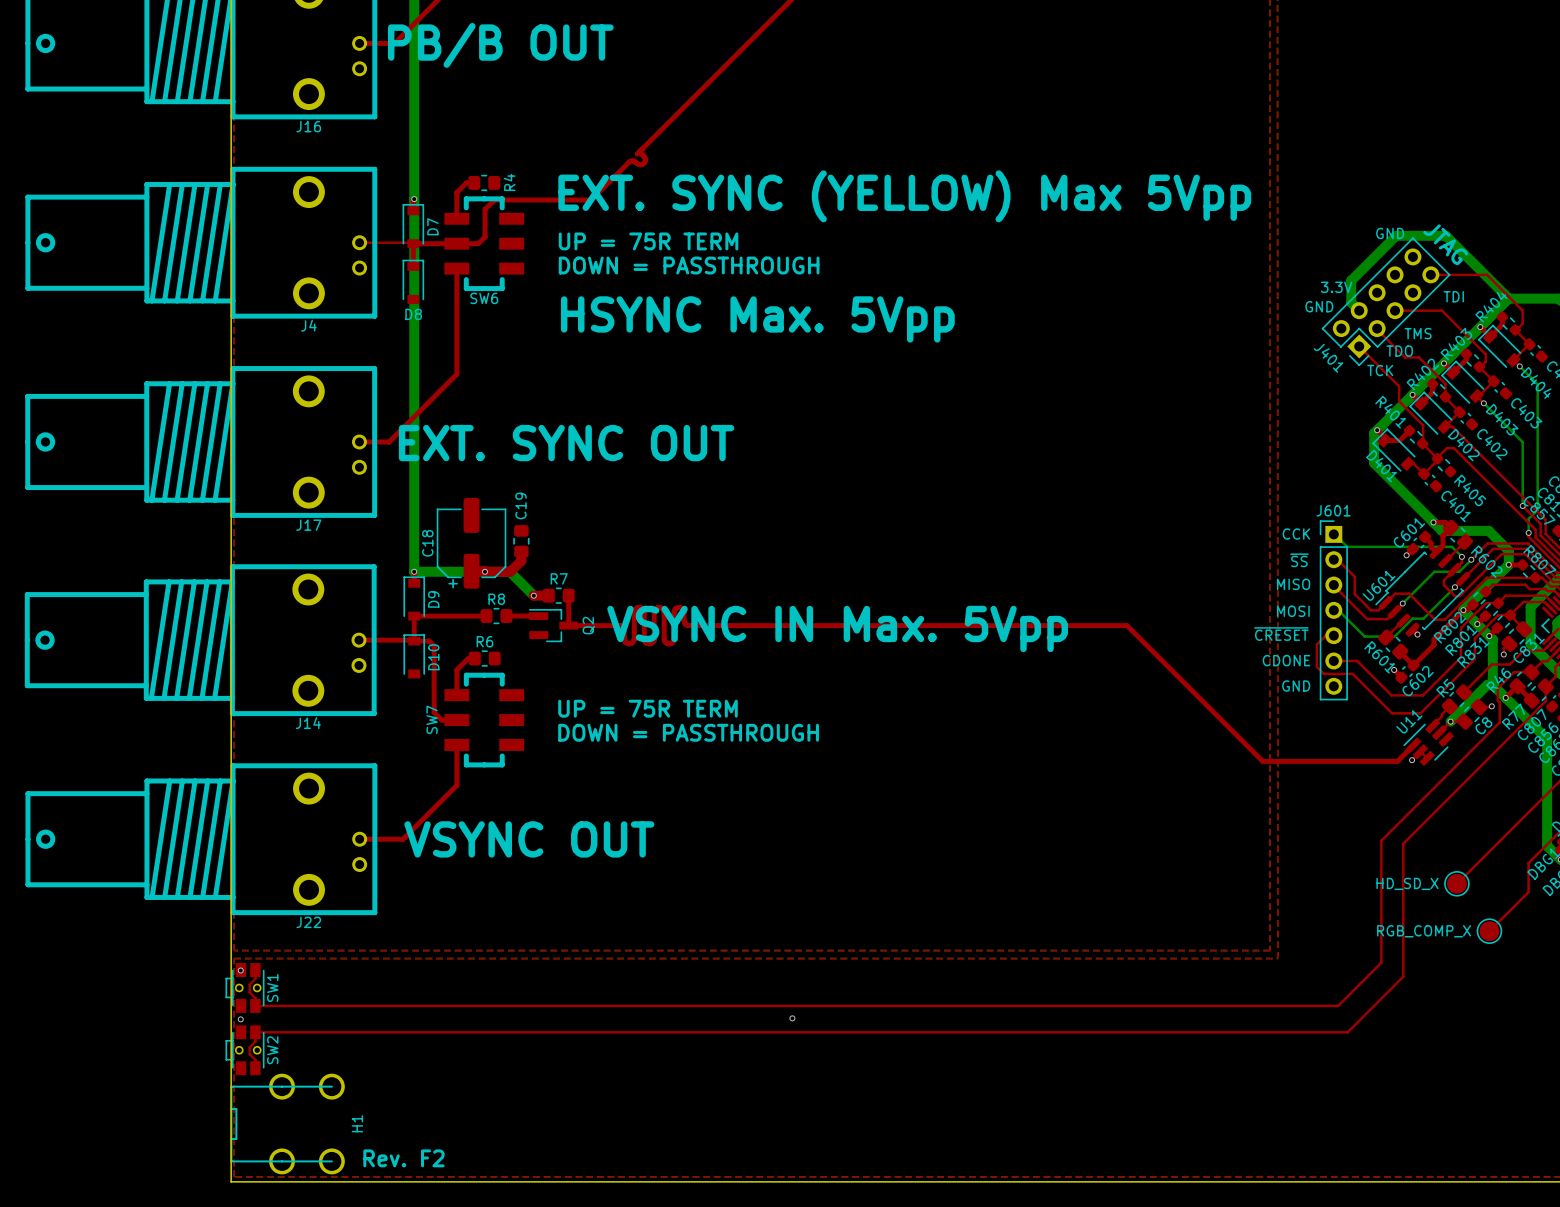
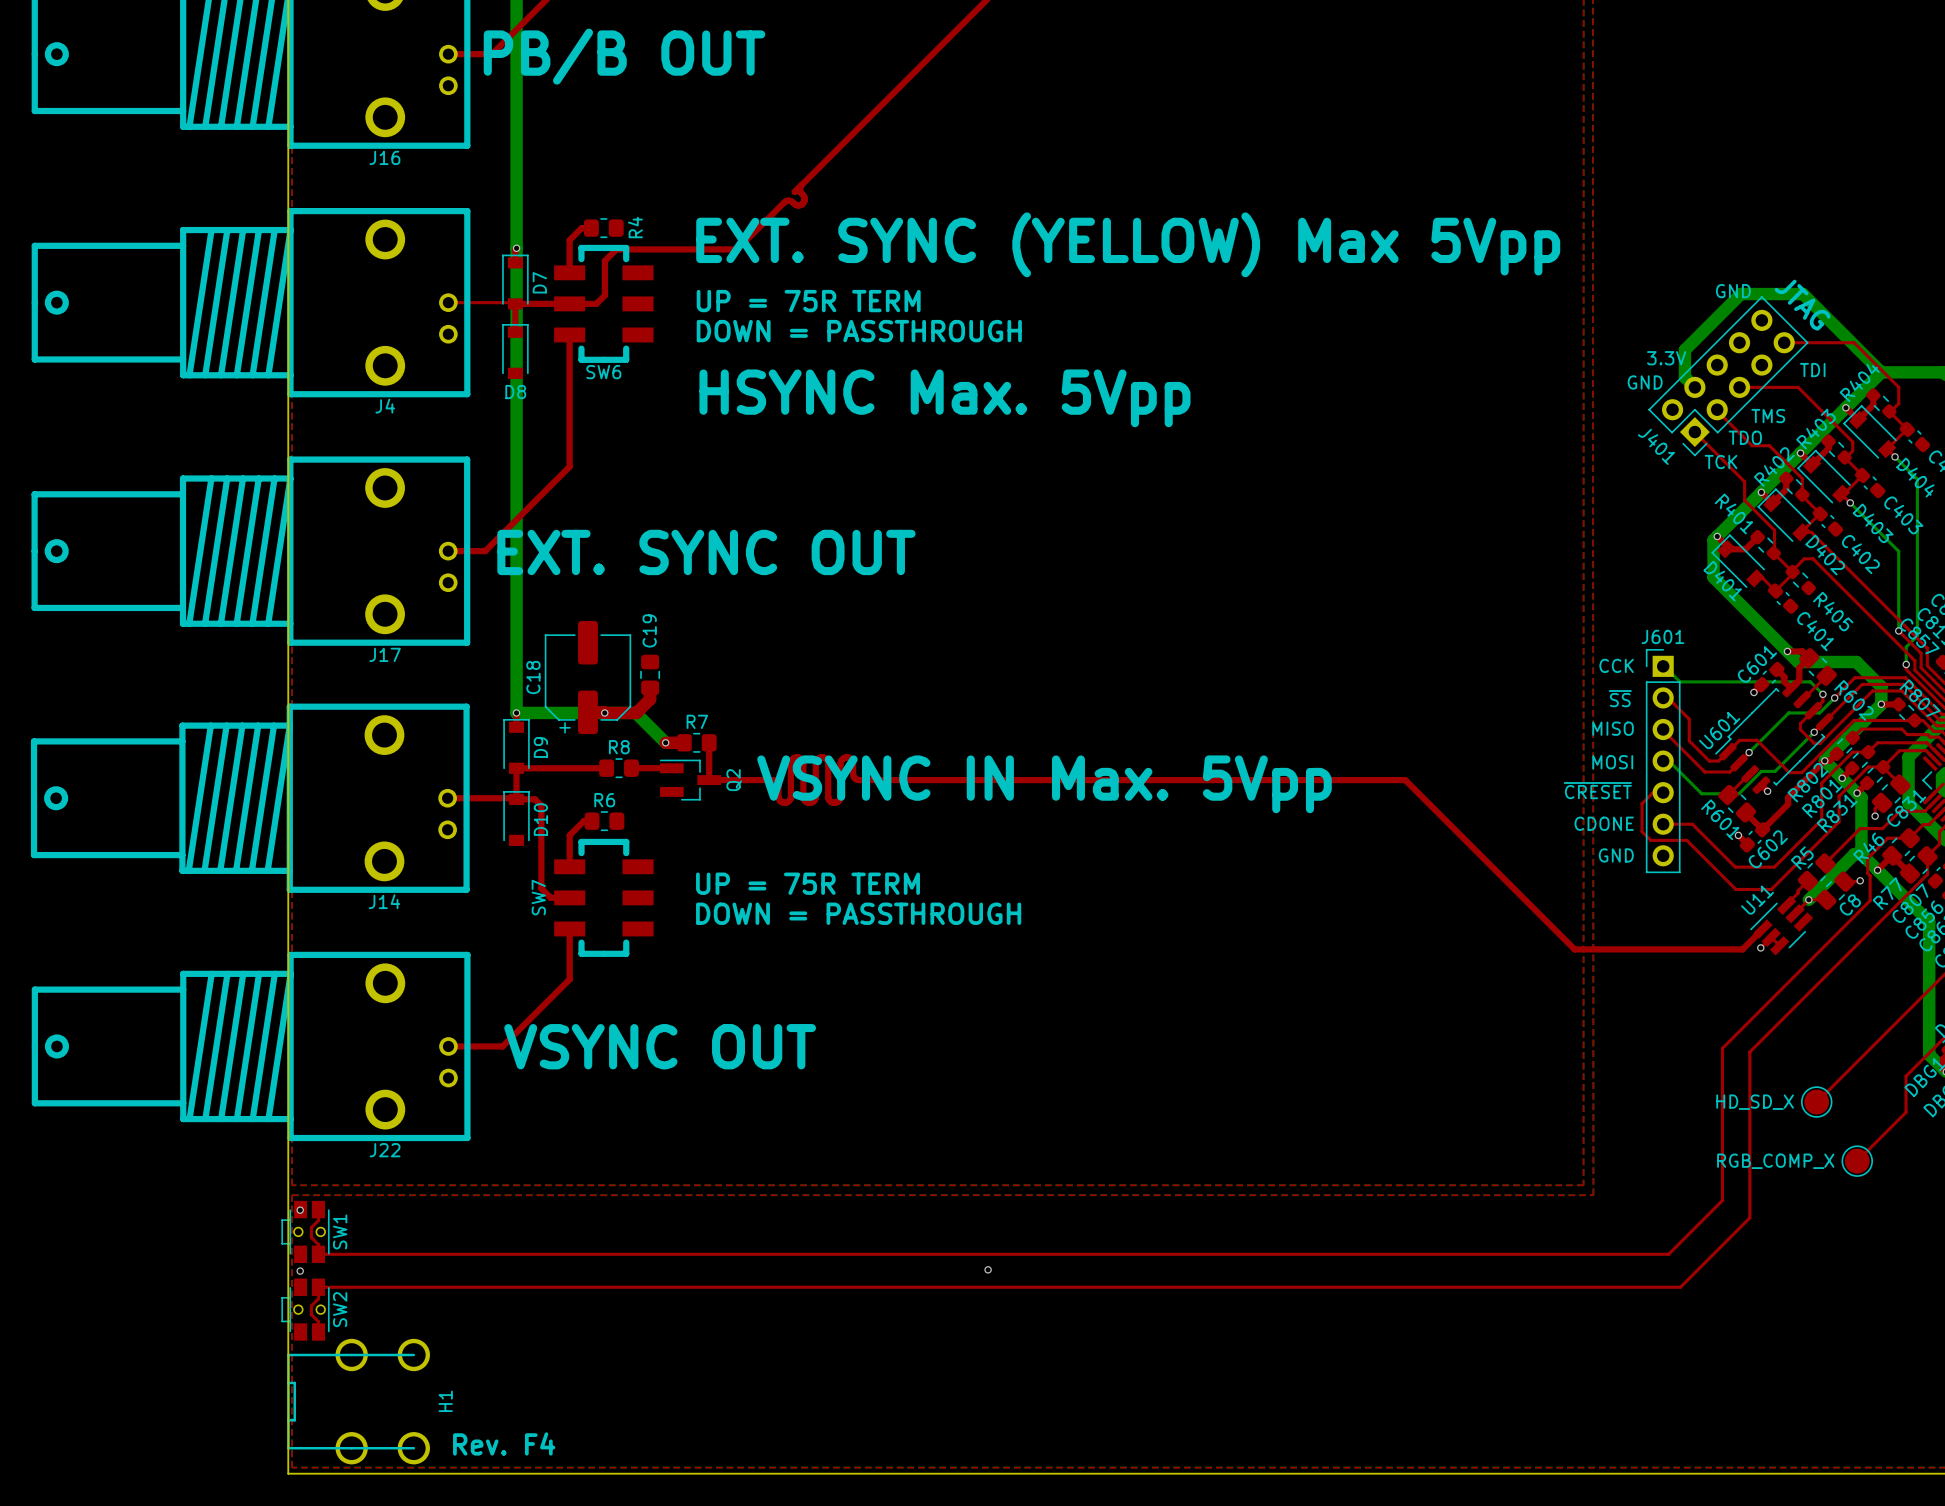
text: Rev. F2 (404, 1158) -> Rev. F4 (504, 1443)

